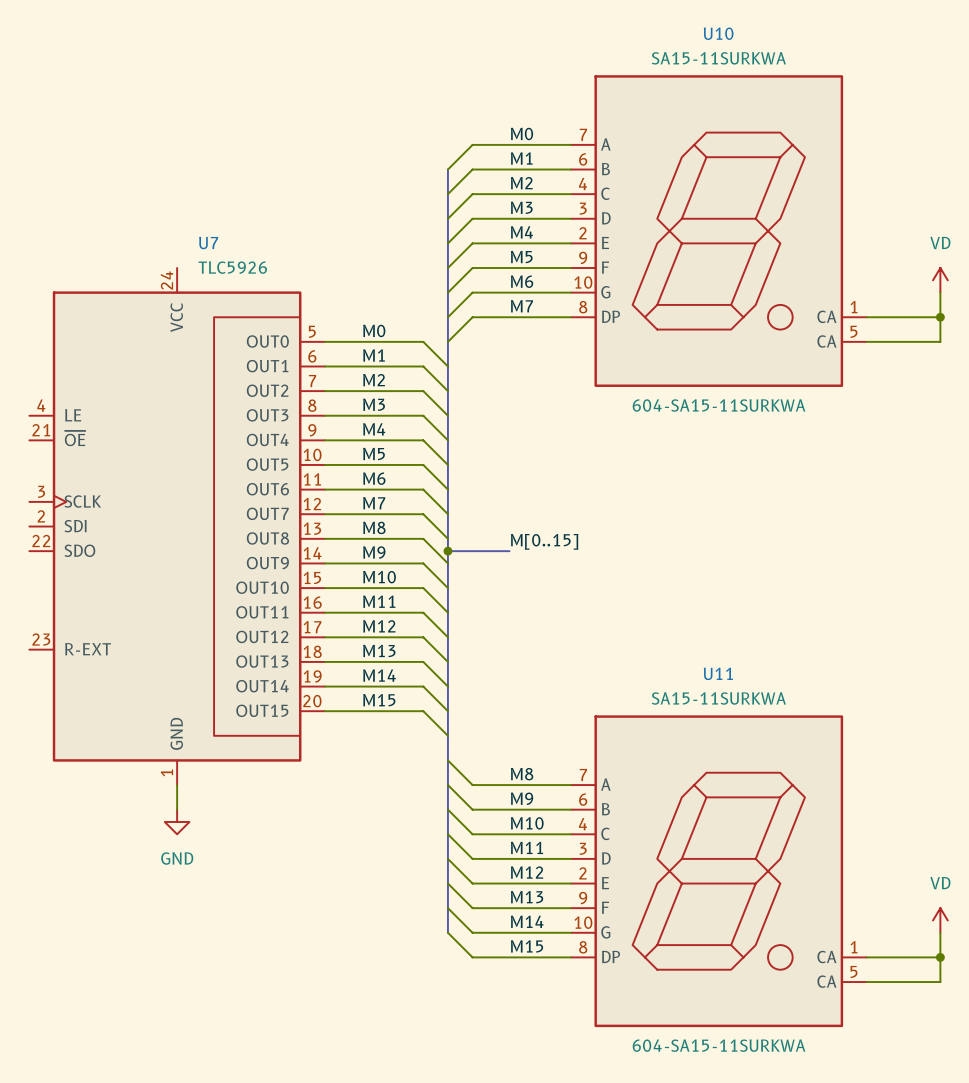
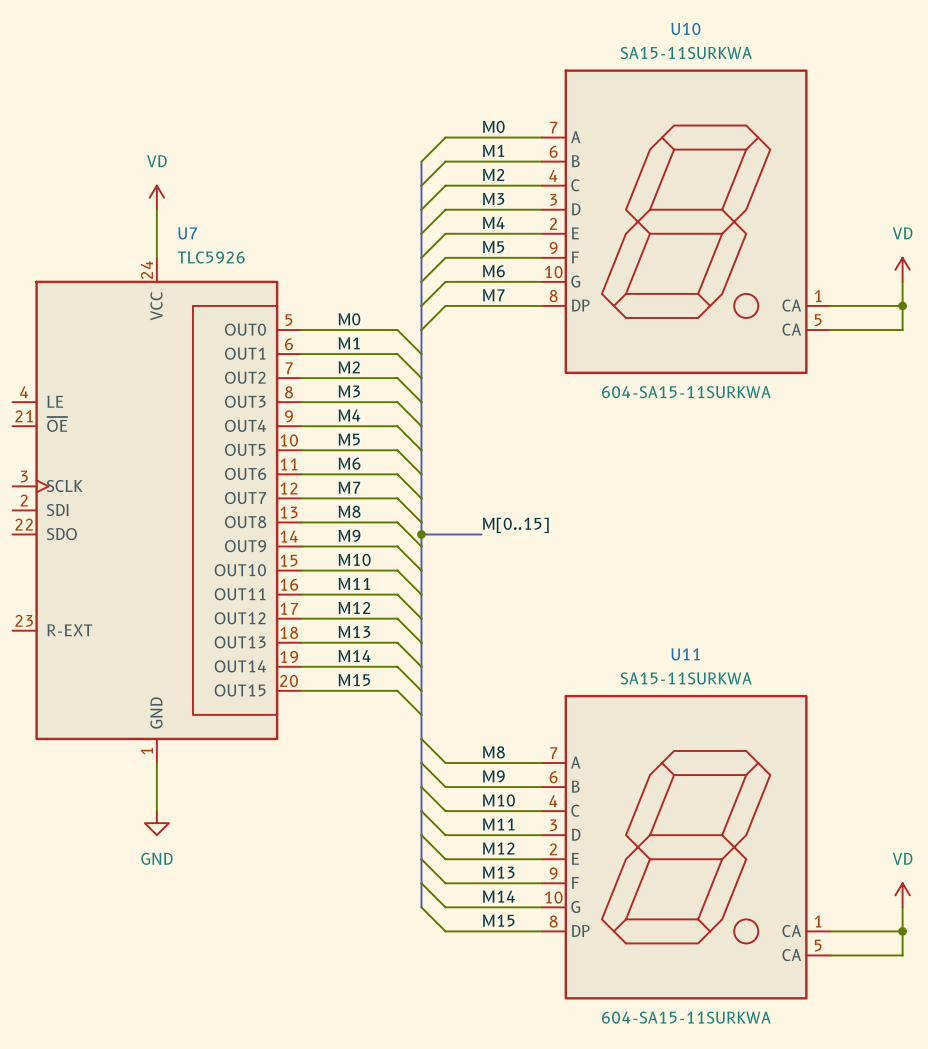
power symbol: none -> VD (156, 197)
wire: none -> (156, 209) (156, 257)
power symbol position: GND (177, 821) -> GND (156, 823)

